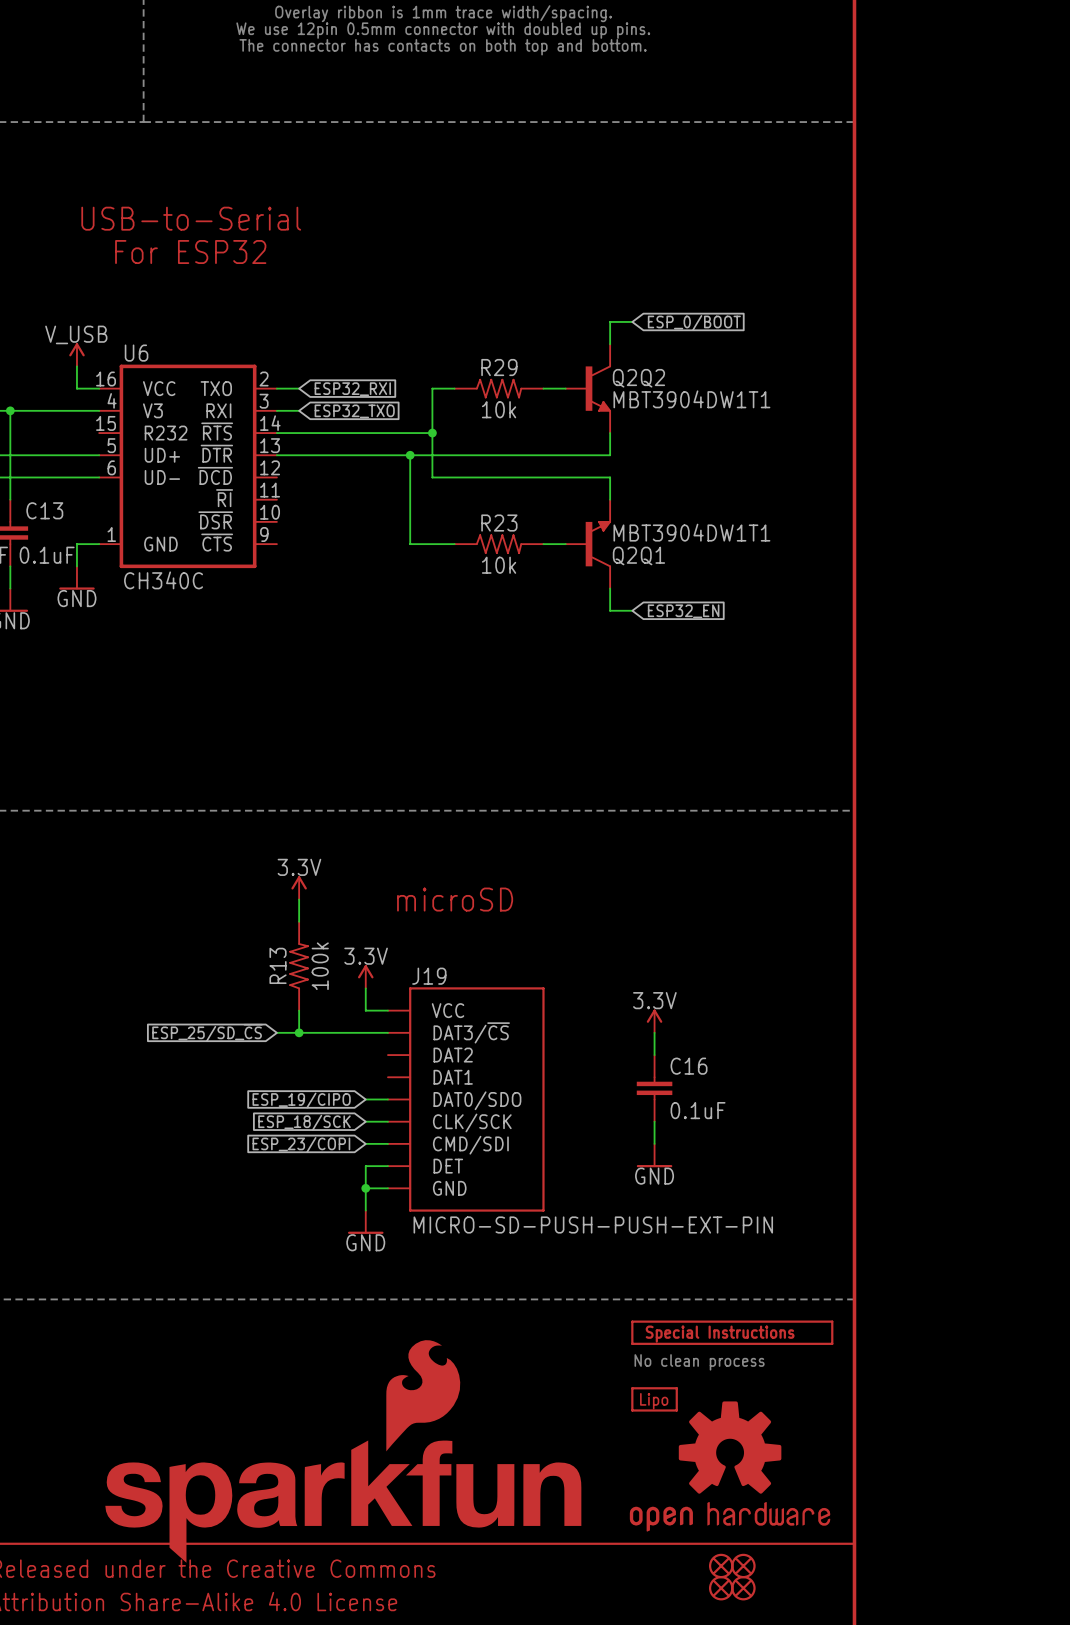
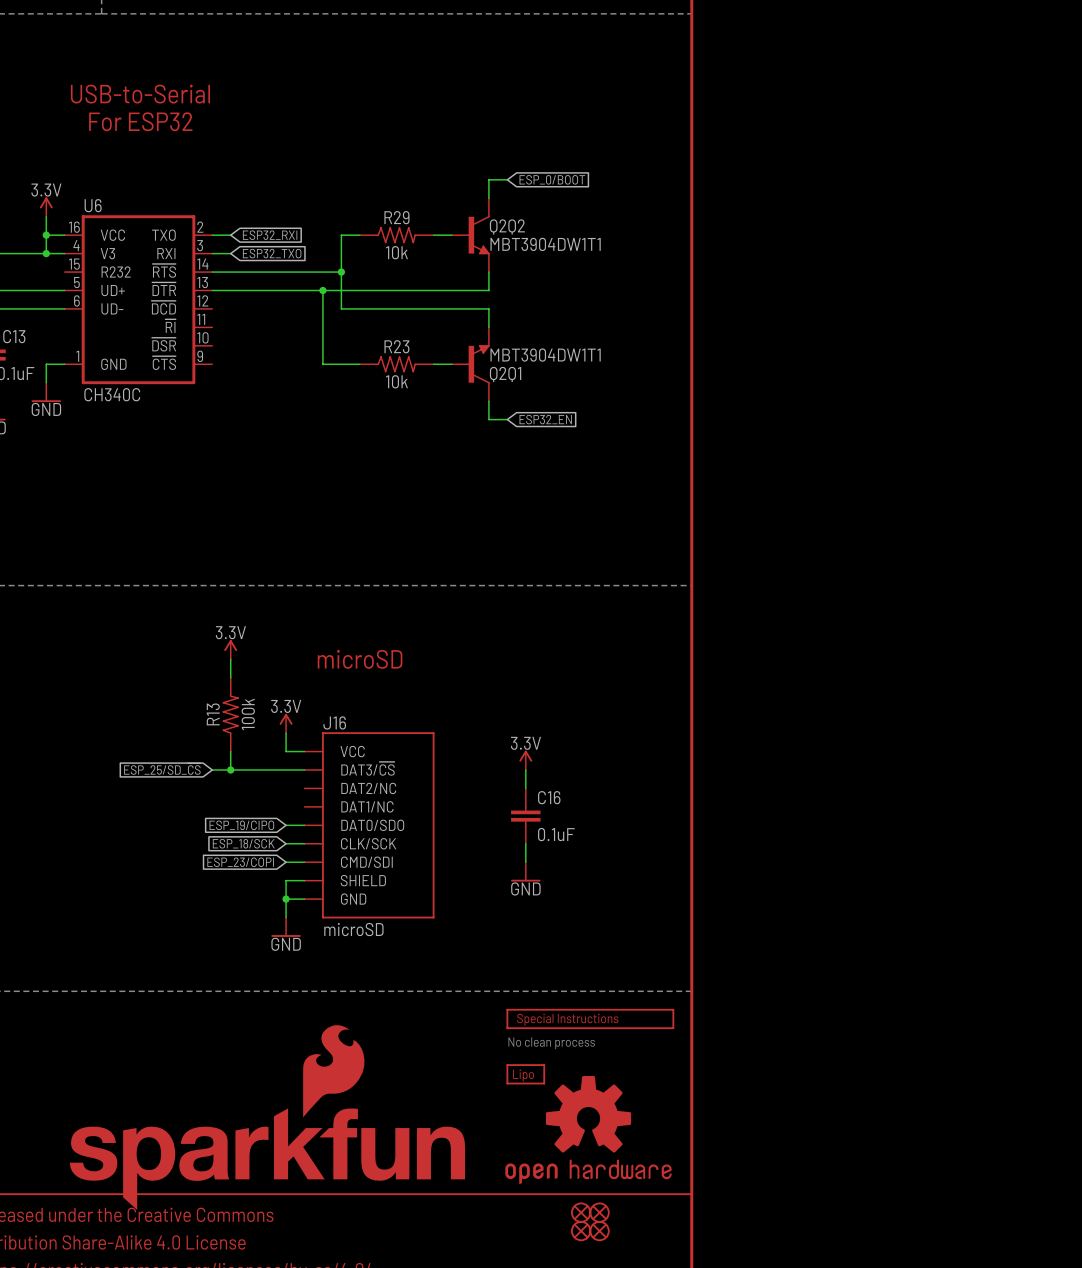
power symbol: V_USB (76, 354) -> 3.3V (46, 207)
wire: none -> (46, 235) (46, 253)
junction: none -> (46, 235)
junction: none -> (46, 253)
J19 name: J19 (429, 976) -> J16 (334, 722)
J19 pin name: DAT2 (453, 1055) -> DAT2/NC (368, 788)
J19 pin name: DAT1 (453, 1077) -> DAT1/NC (367, 806)
J19 pin name: DET (448, 1166) -> SHIELD (363, 880)
J19 value: MICRO-SD-PUSH-PUSH-EXT-PIN (593, 1225) -> microSD (353, 929)

